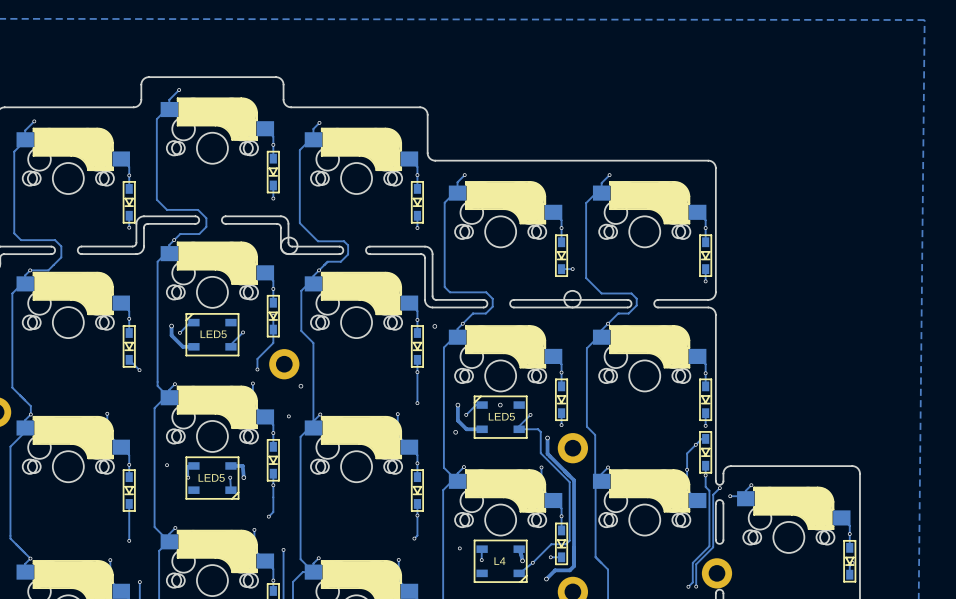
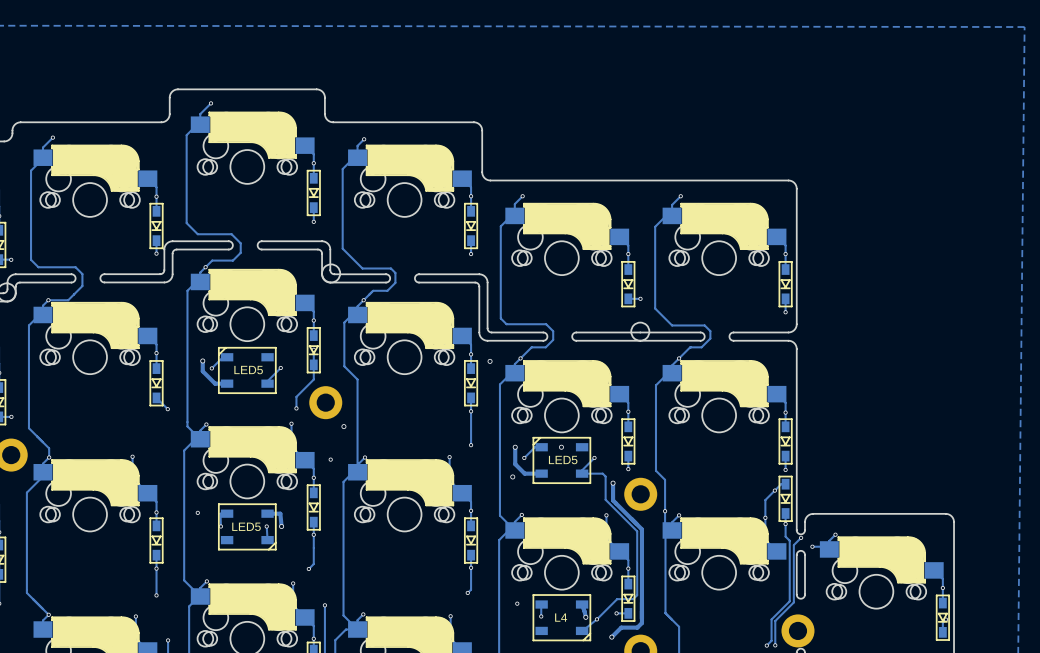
via: none -> (665, 511)
via: none -> (156, 568)

